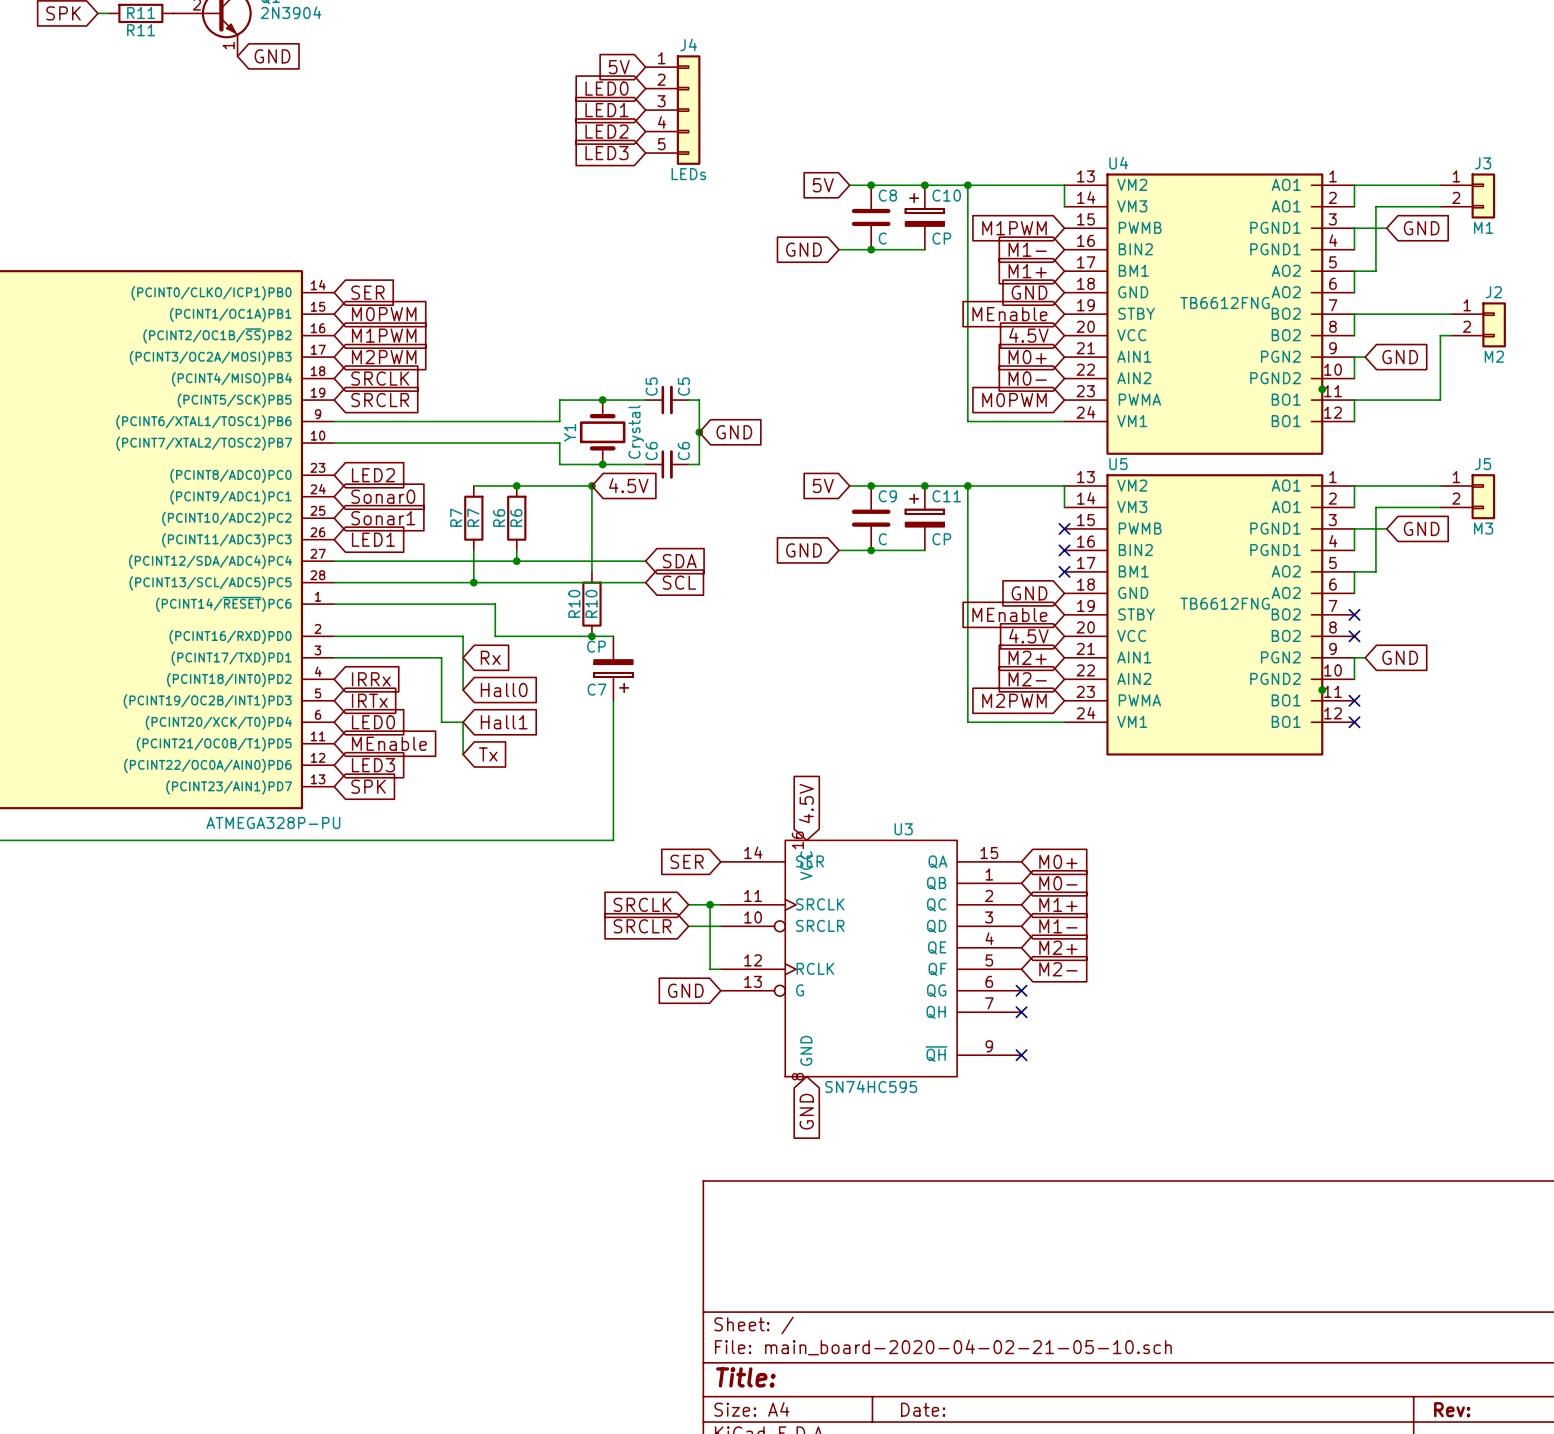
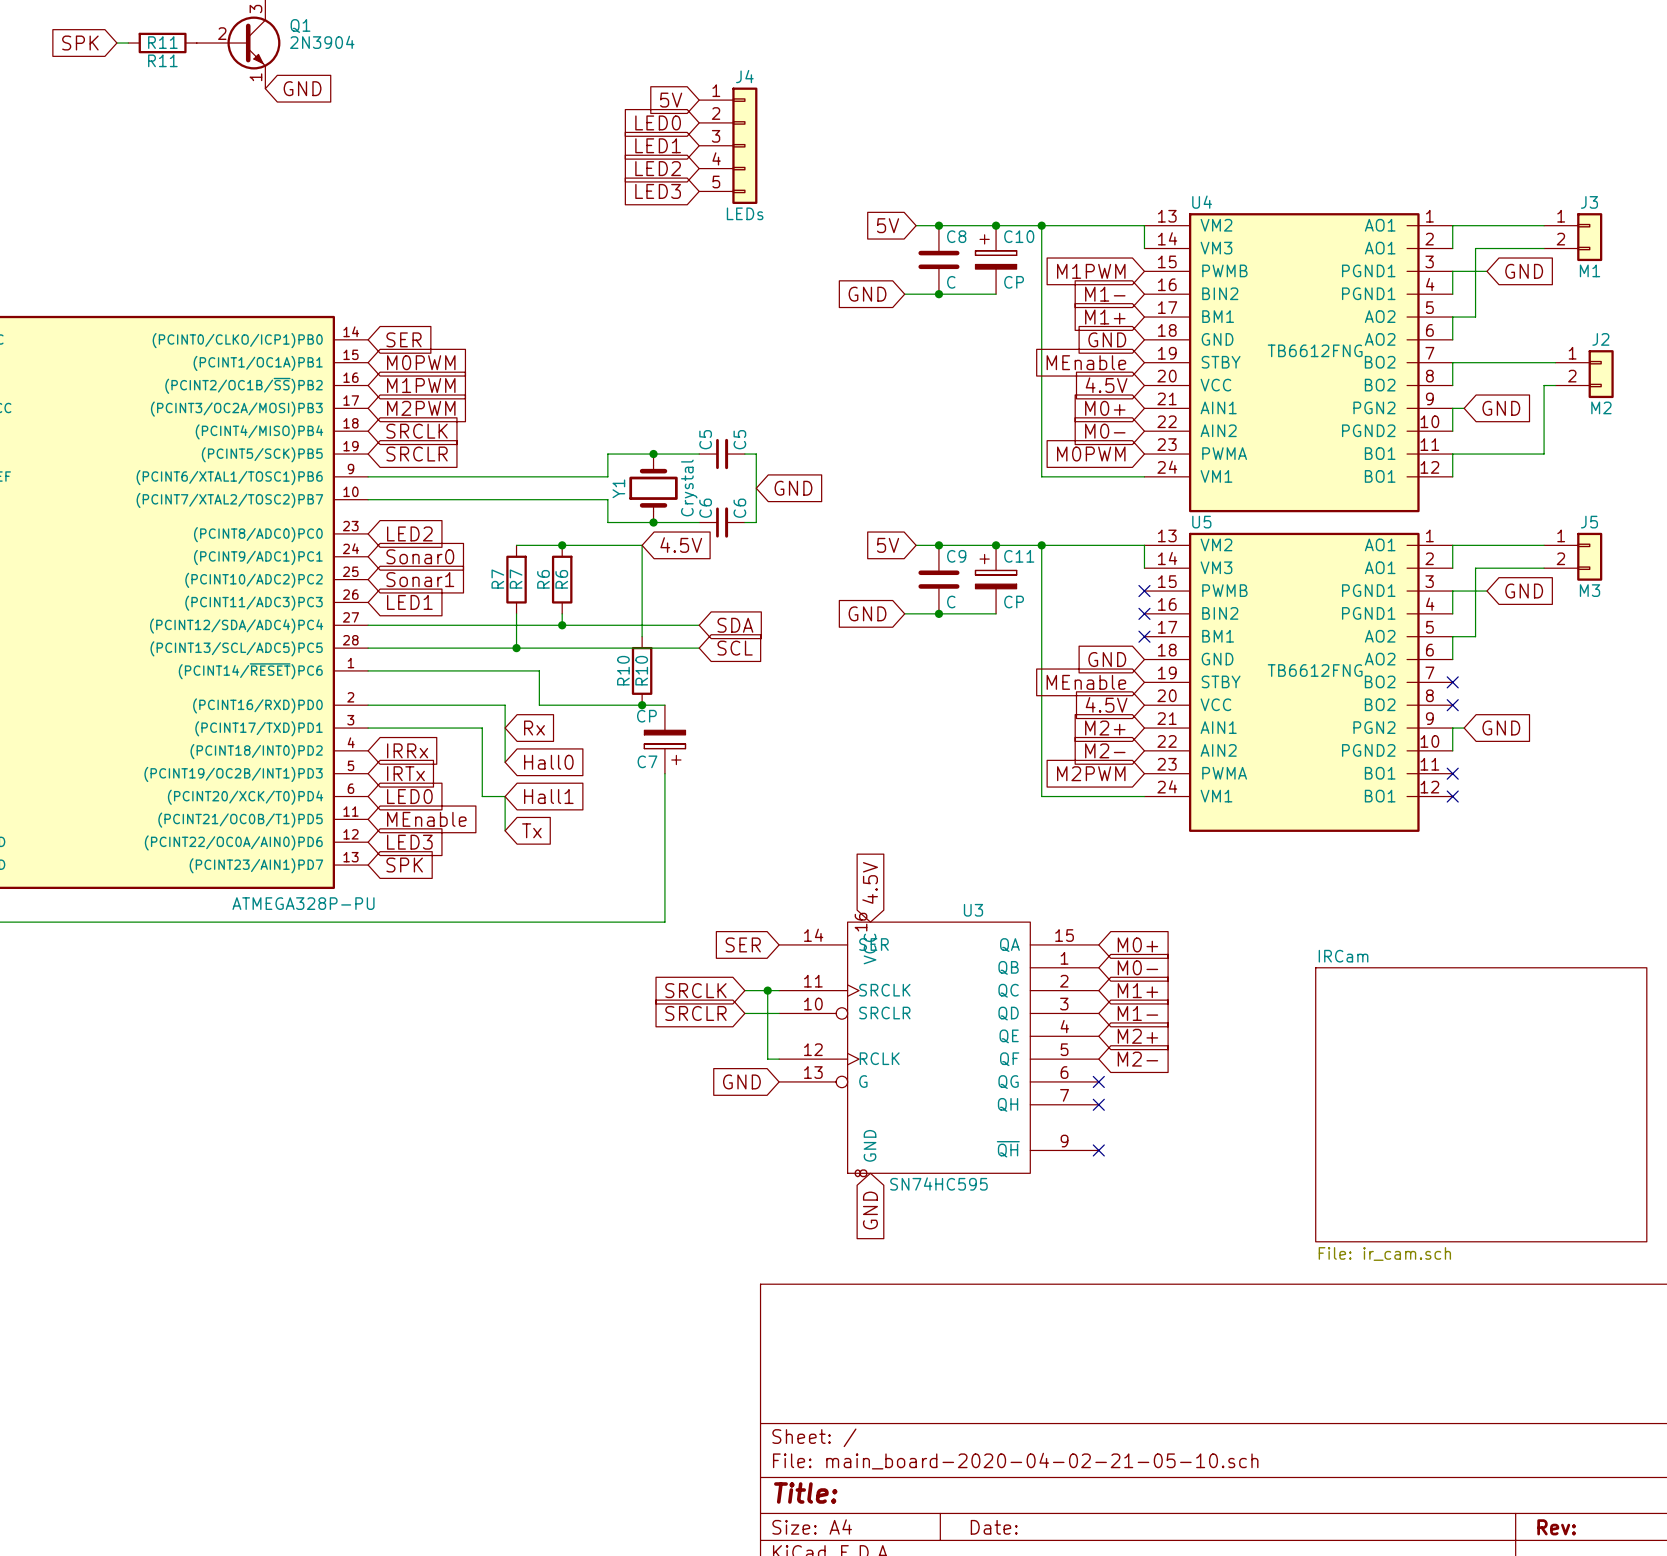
junction: (1322, 389) -> none
junction: (699, 432) -> none
junction: (591, 485) -> none
junction: (1322, 690) -> none
sheet IRCam: none -> File: ir_cam.sch (1481, 1104)

